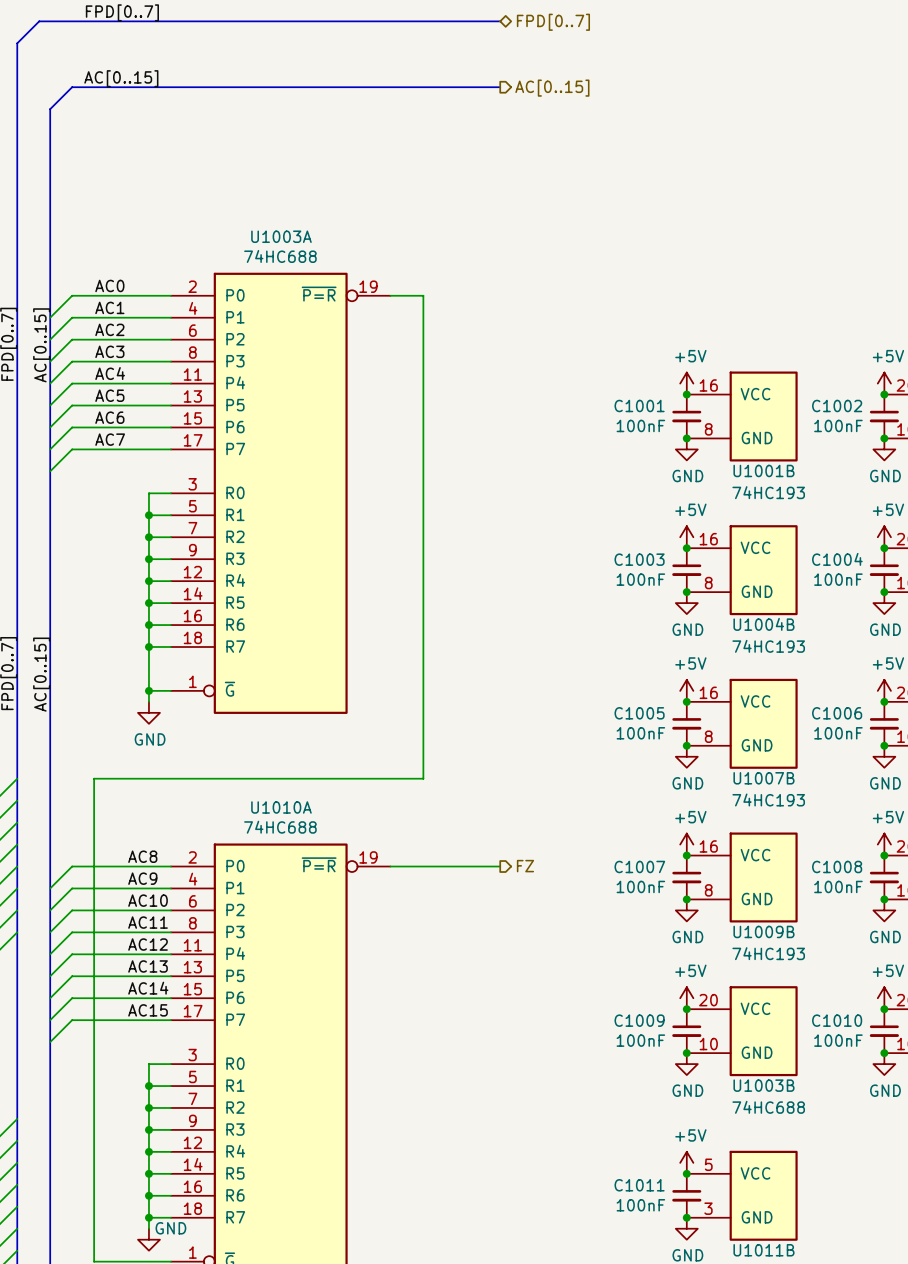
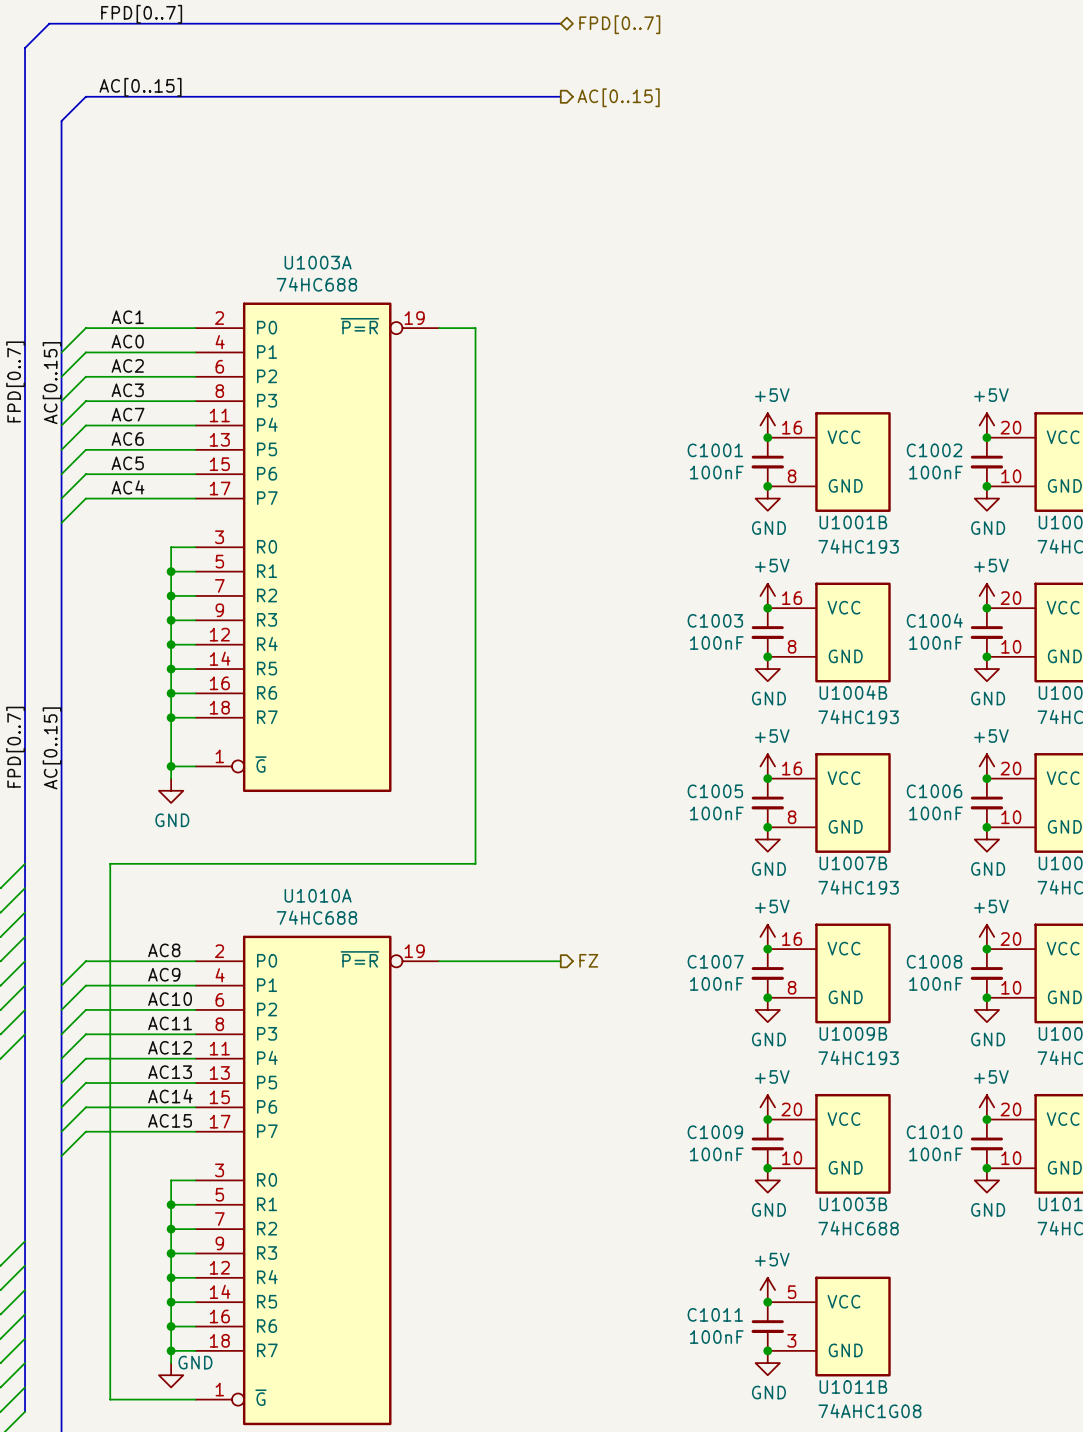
label: AC0 (109, 285) -> AC1 (127, 317)
label: AC1 (109, 307) -> AC0 (127, 341)
label: AC4 (110, 373) -> AC7 (128, 414)
label: AC5 (109, 395) -> AC6 (127, 439)
label: AC6 (109, 417) -> AC5 (127, 463)
label: AC7 (110, 439) -> AC4 (128, 487)

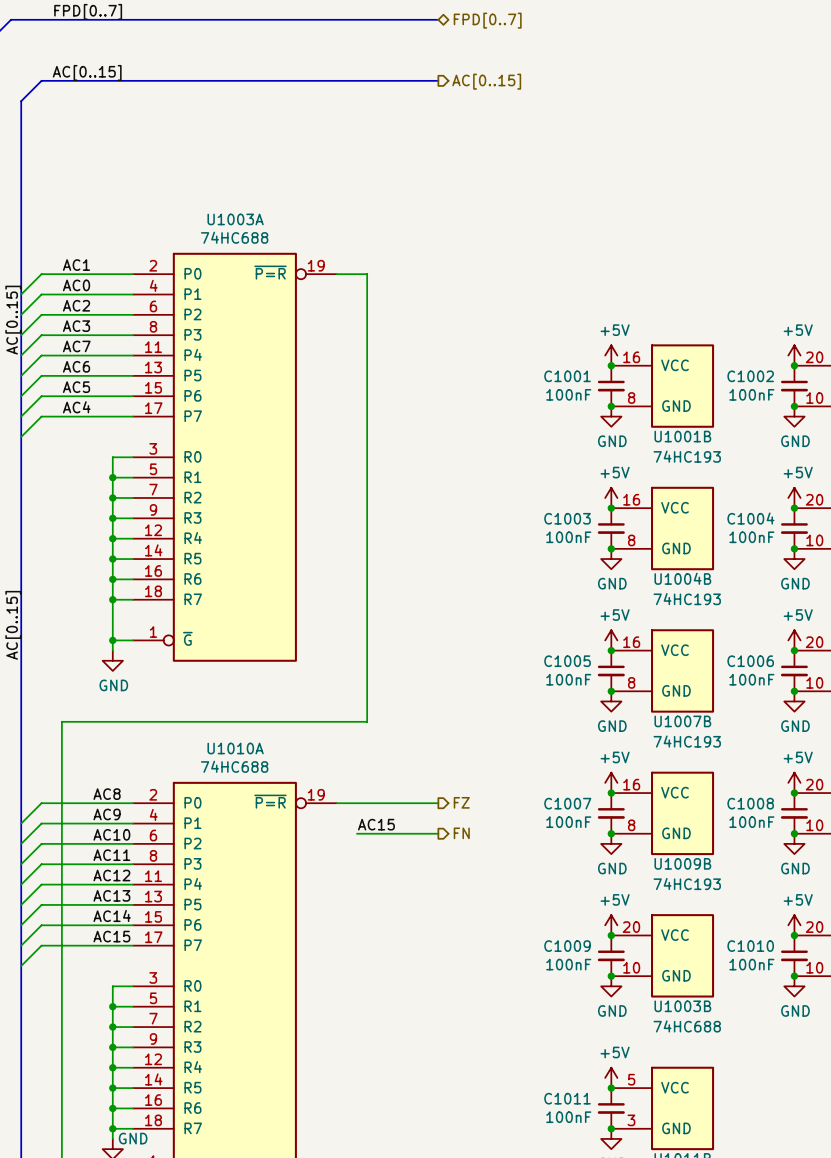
label: none -> AC15 (376, 824)
wire: none -> (356, 833) (438, 833)
hierarchical label: none -> FN (461, 833)

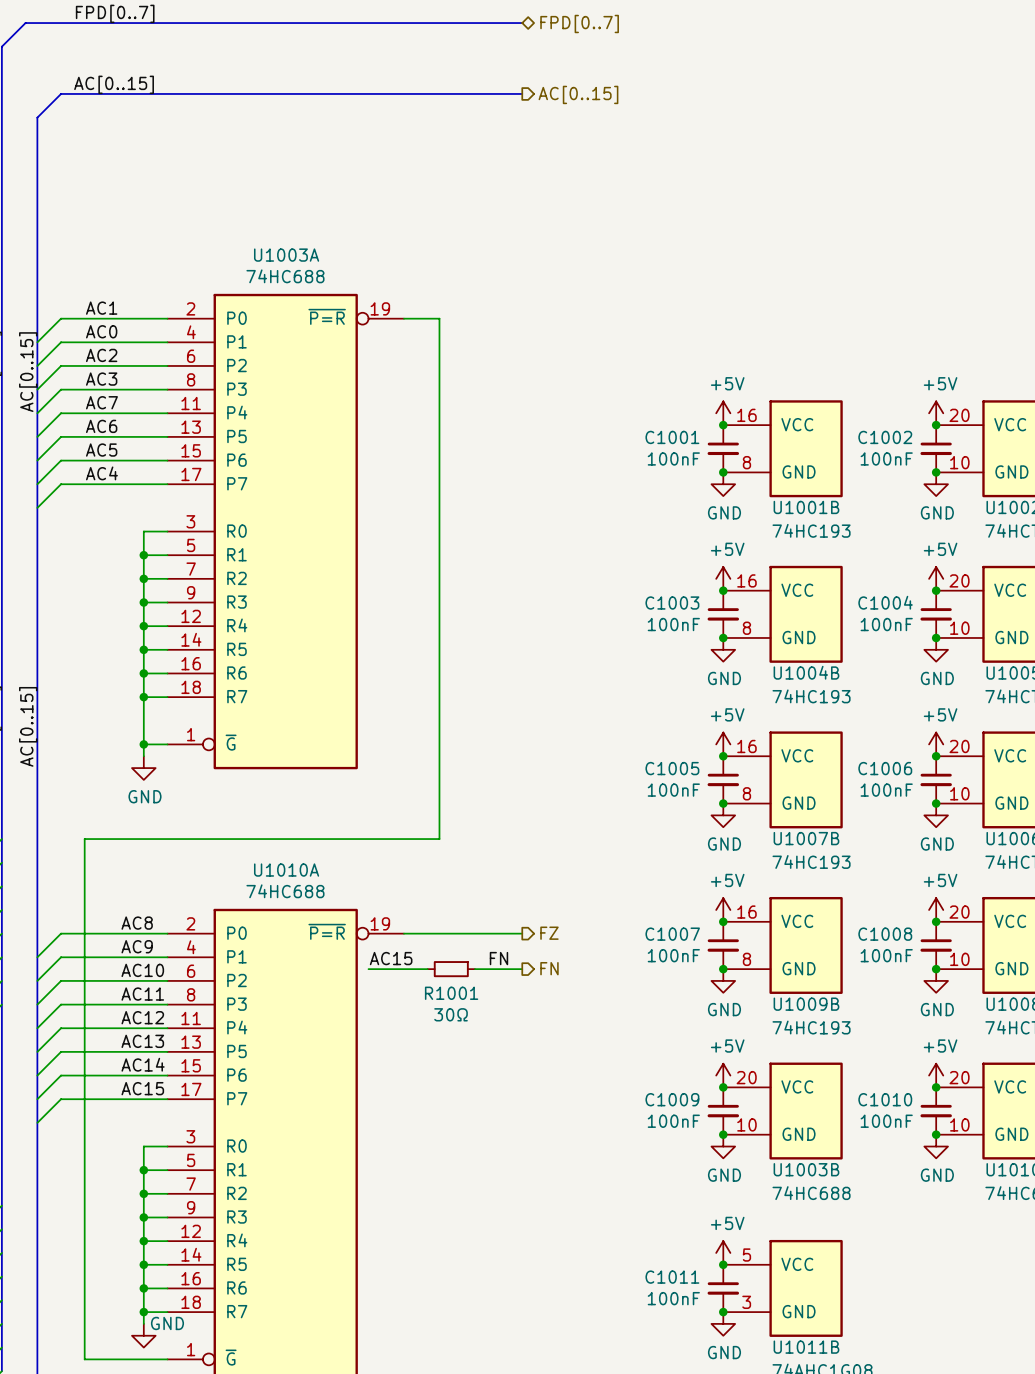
label position: AC15 (376, 824) -> AC15 (391, 958)
label: none -> FN (498, 958)
wire: (356, 833) (397, 833) -> (427, 969) (368, 969)
R1001: none -> 30Ω (451, 969)

